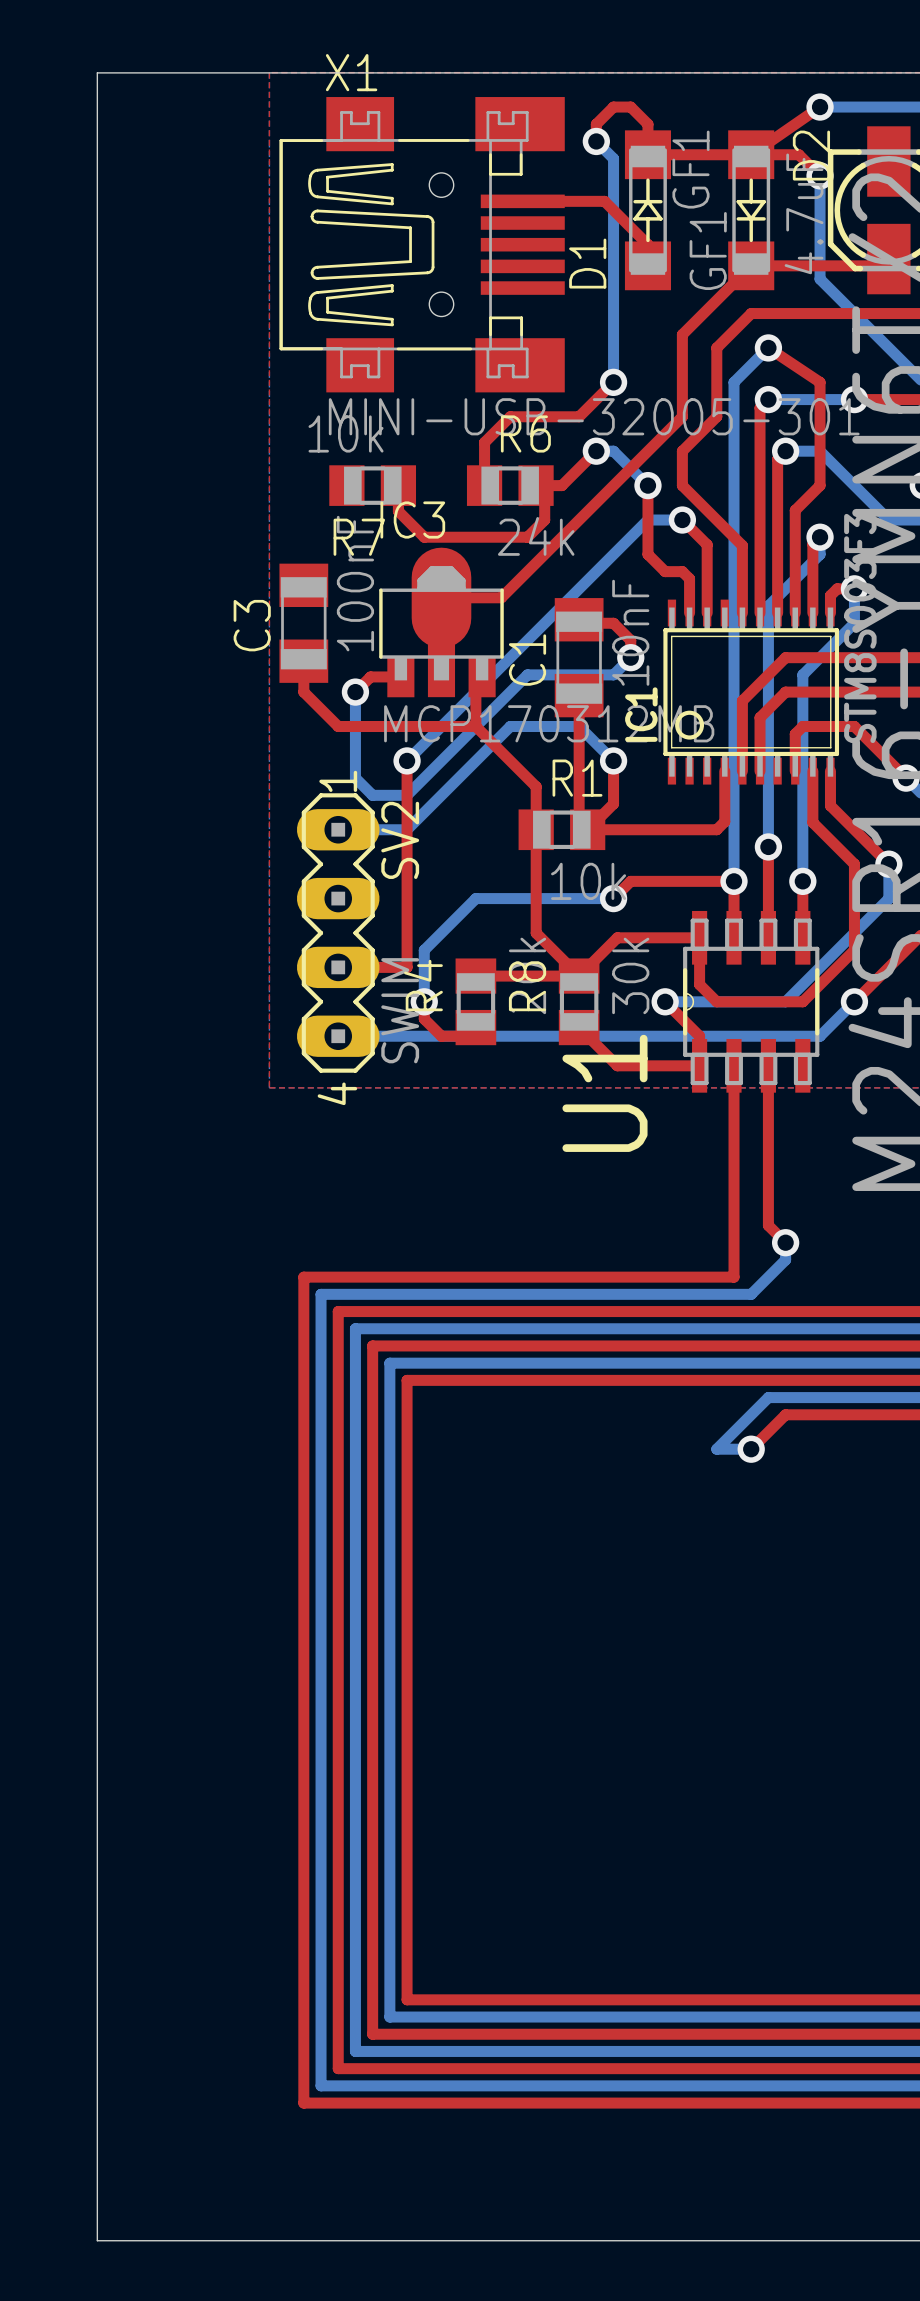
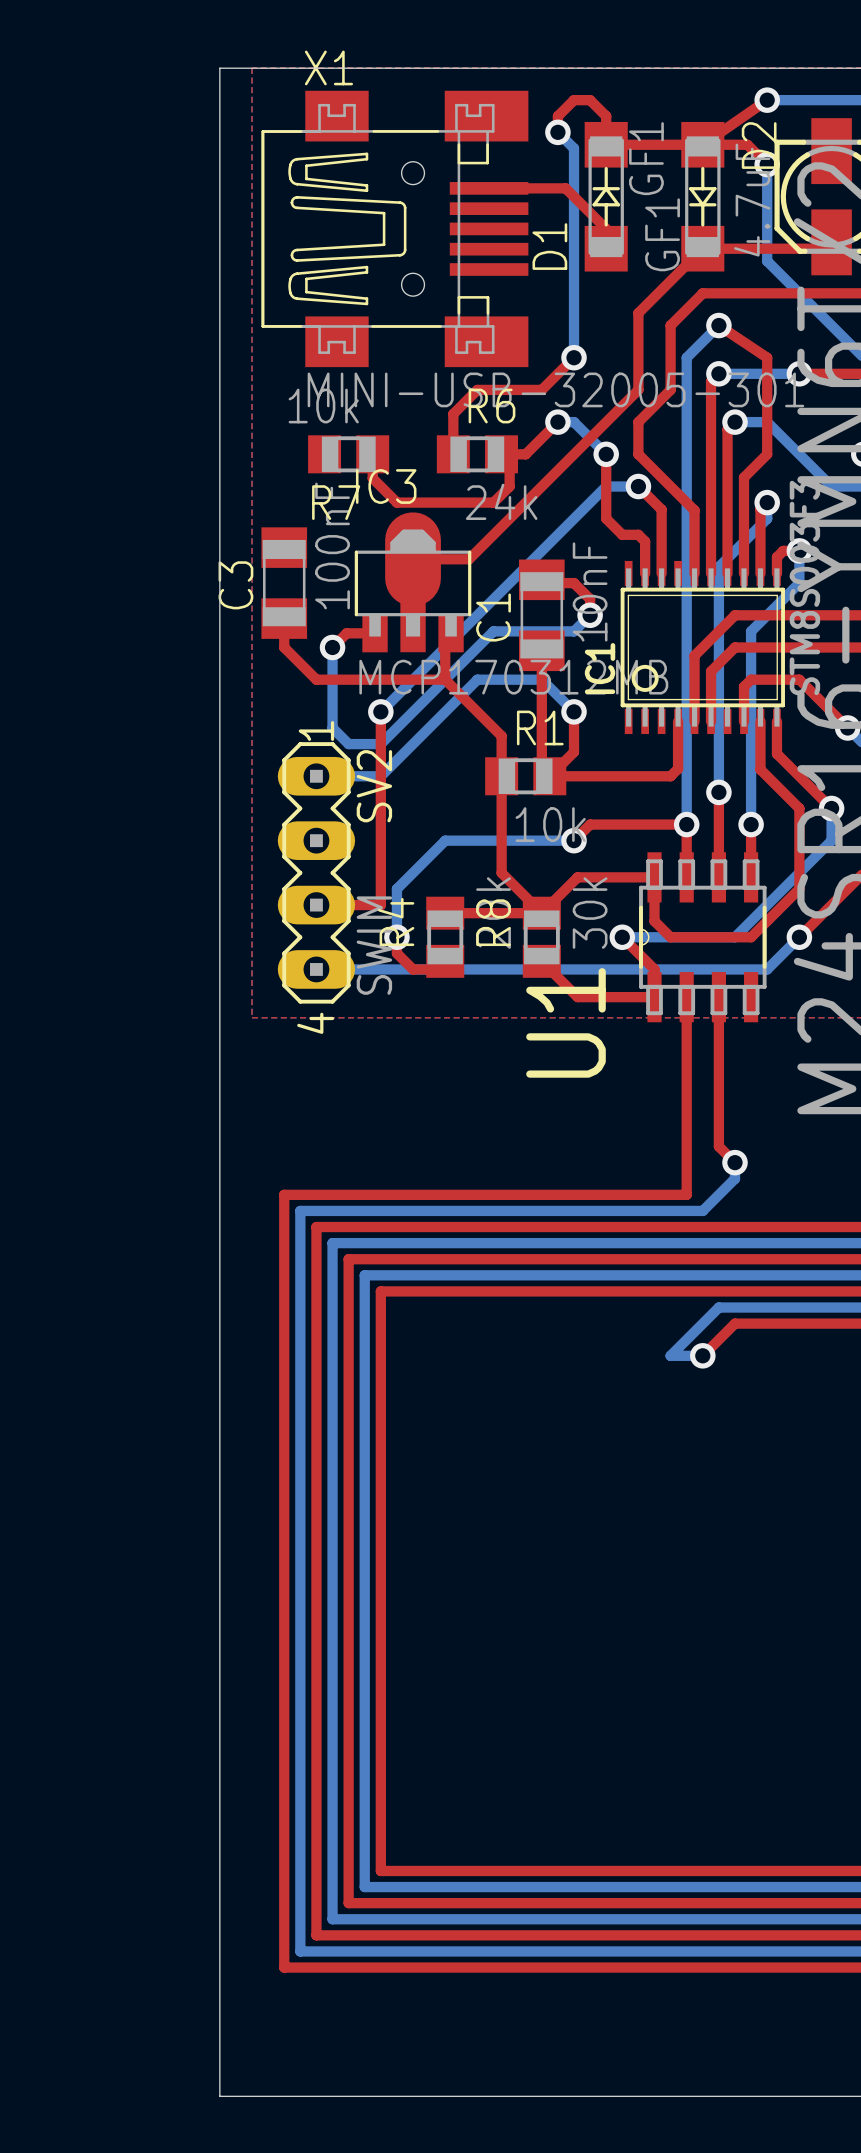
board edge: (235, 72) (97, 72) (97, 2240) (235, 2240) -> (219, 68) (219, 2096)

